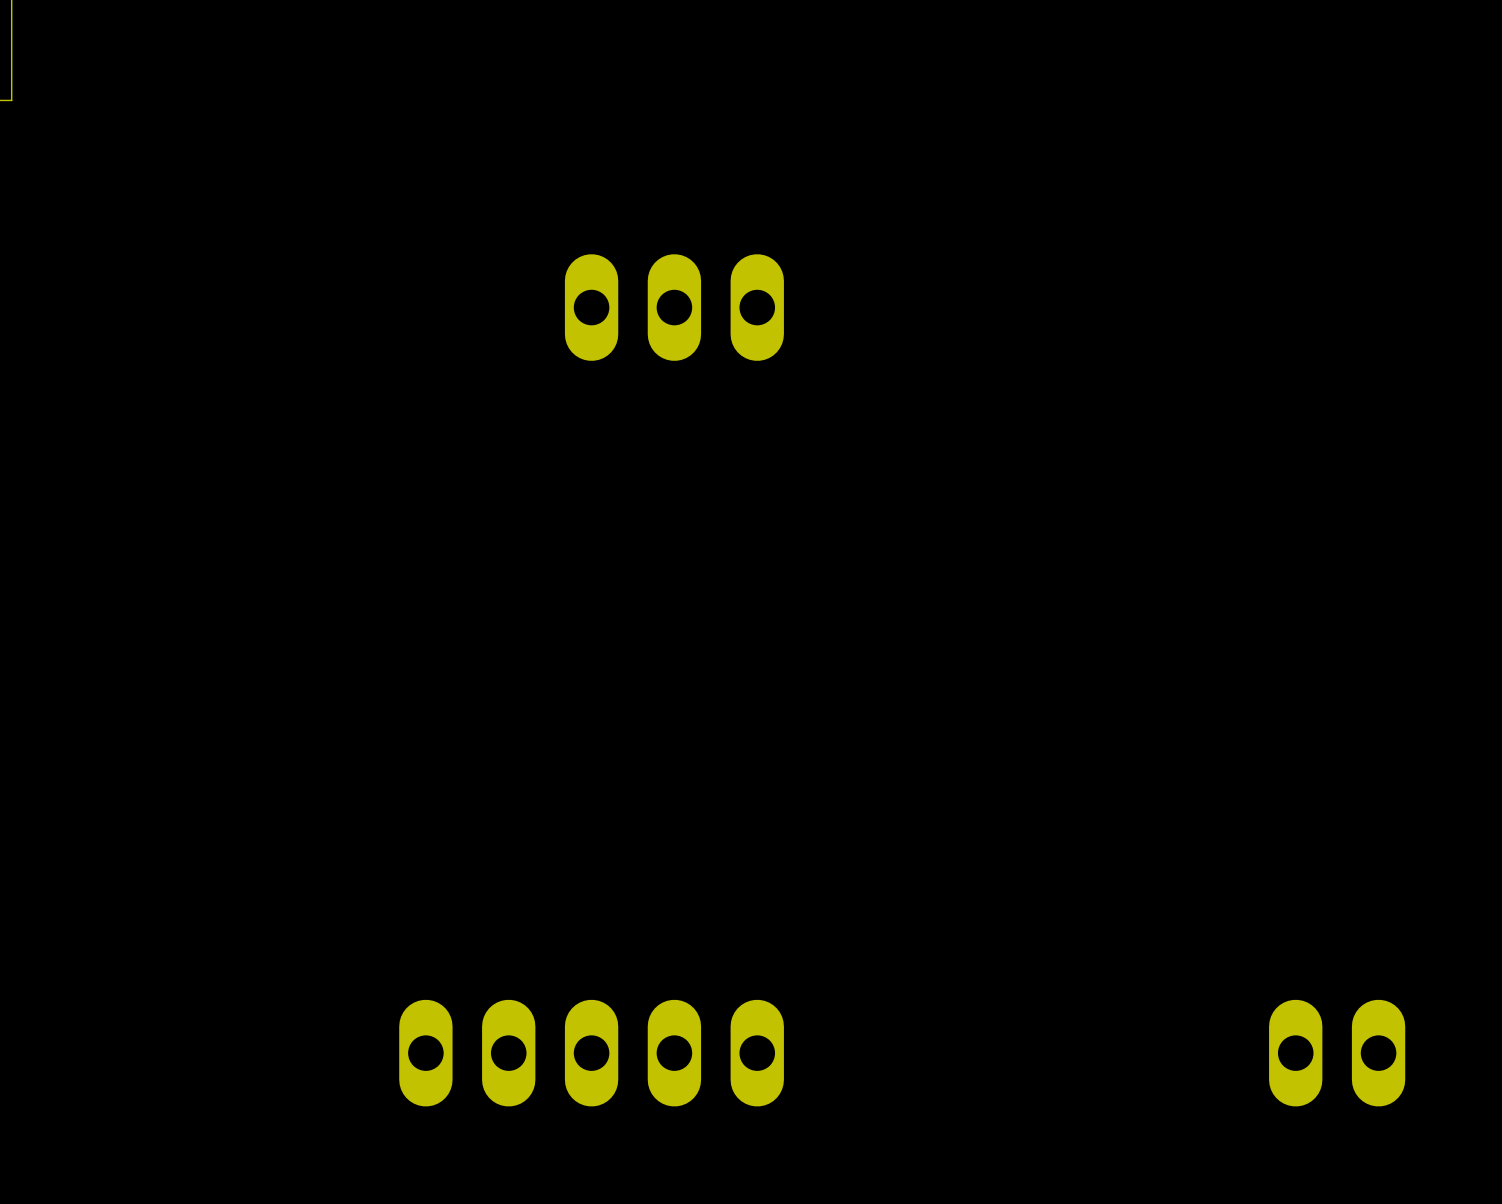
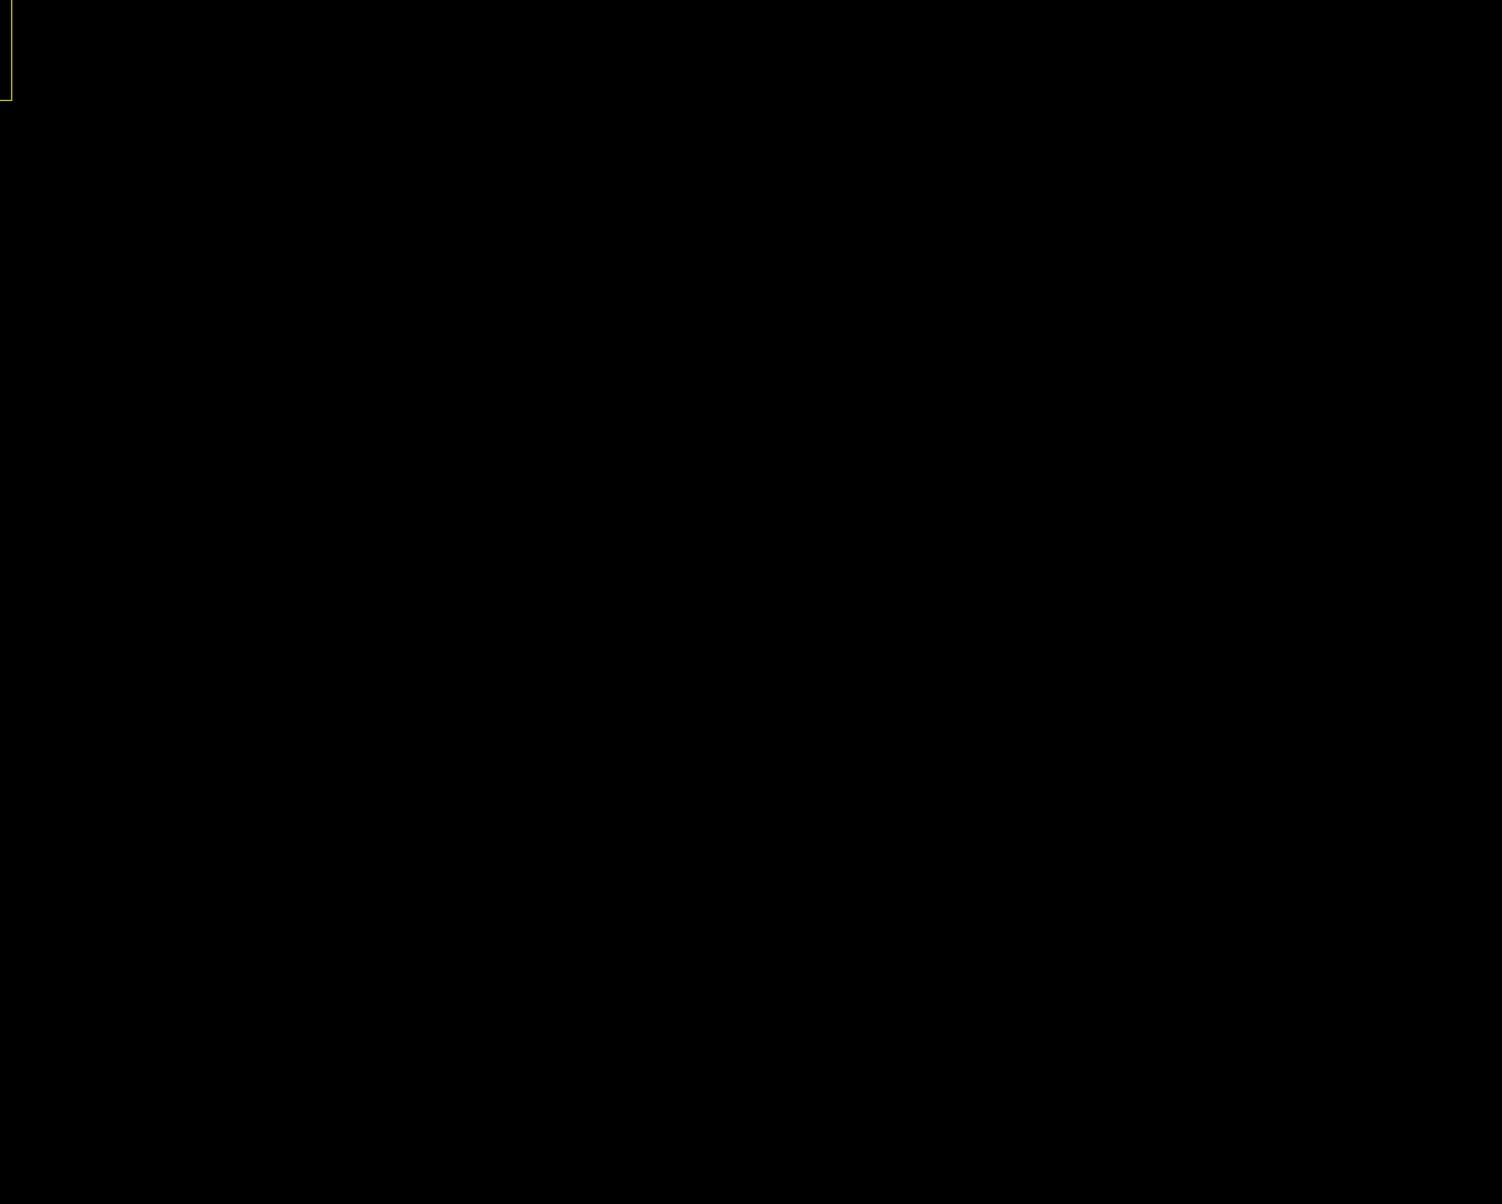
part: (674, 307) -> none
part: (591, 1053) -> none
part: (1337, 1053) -> none

